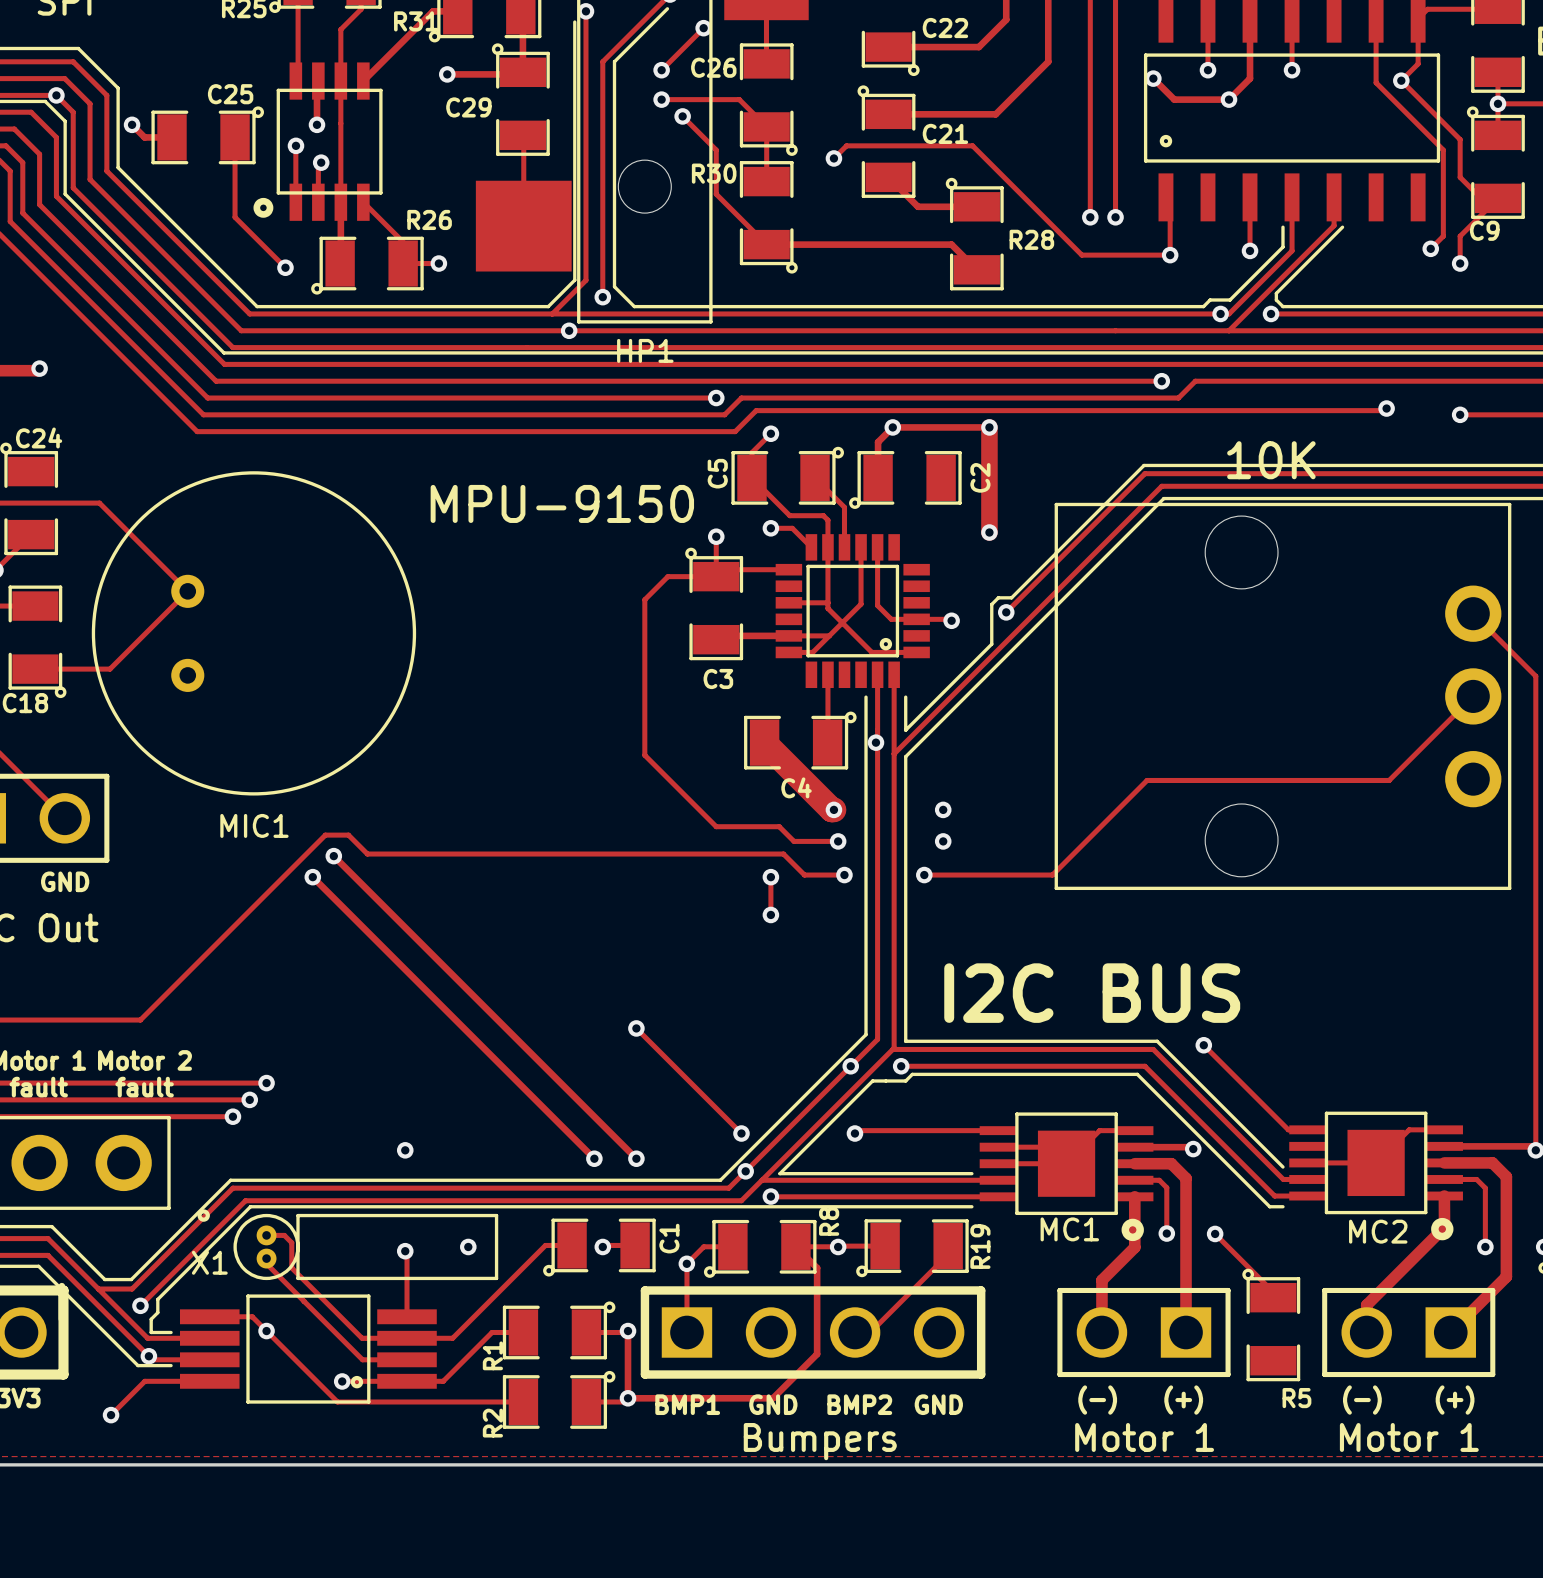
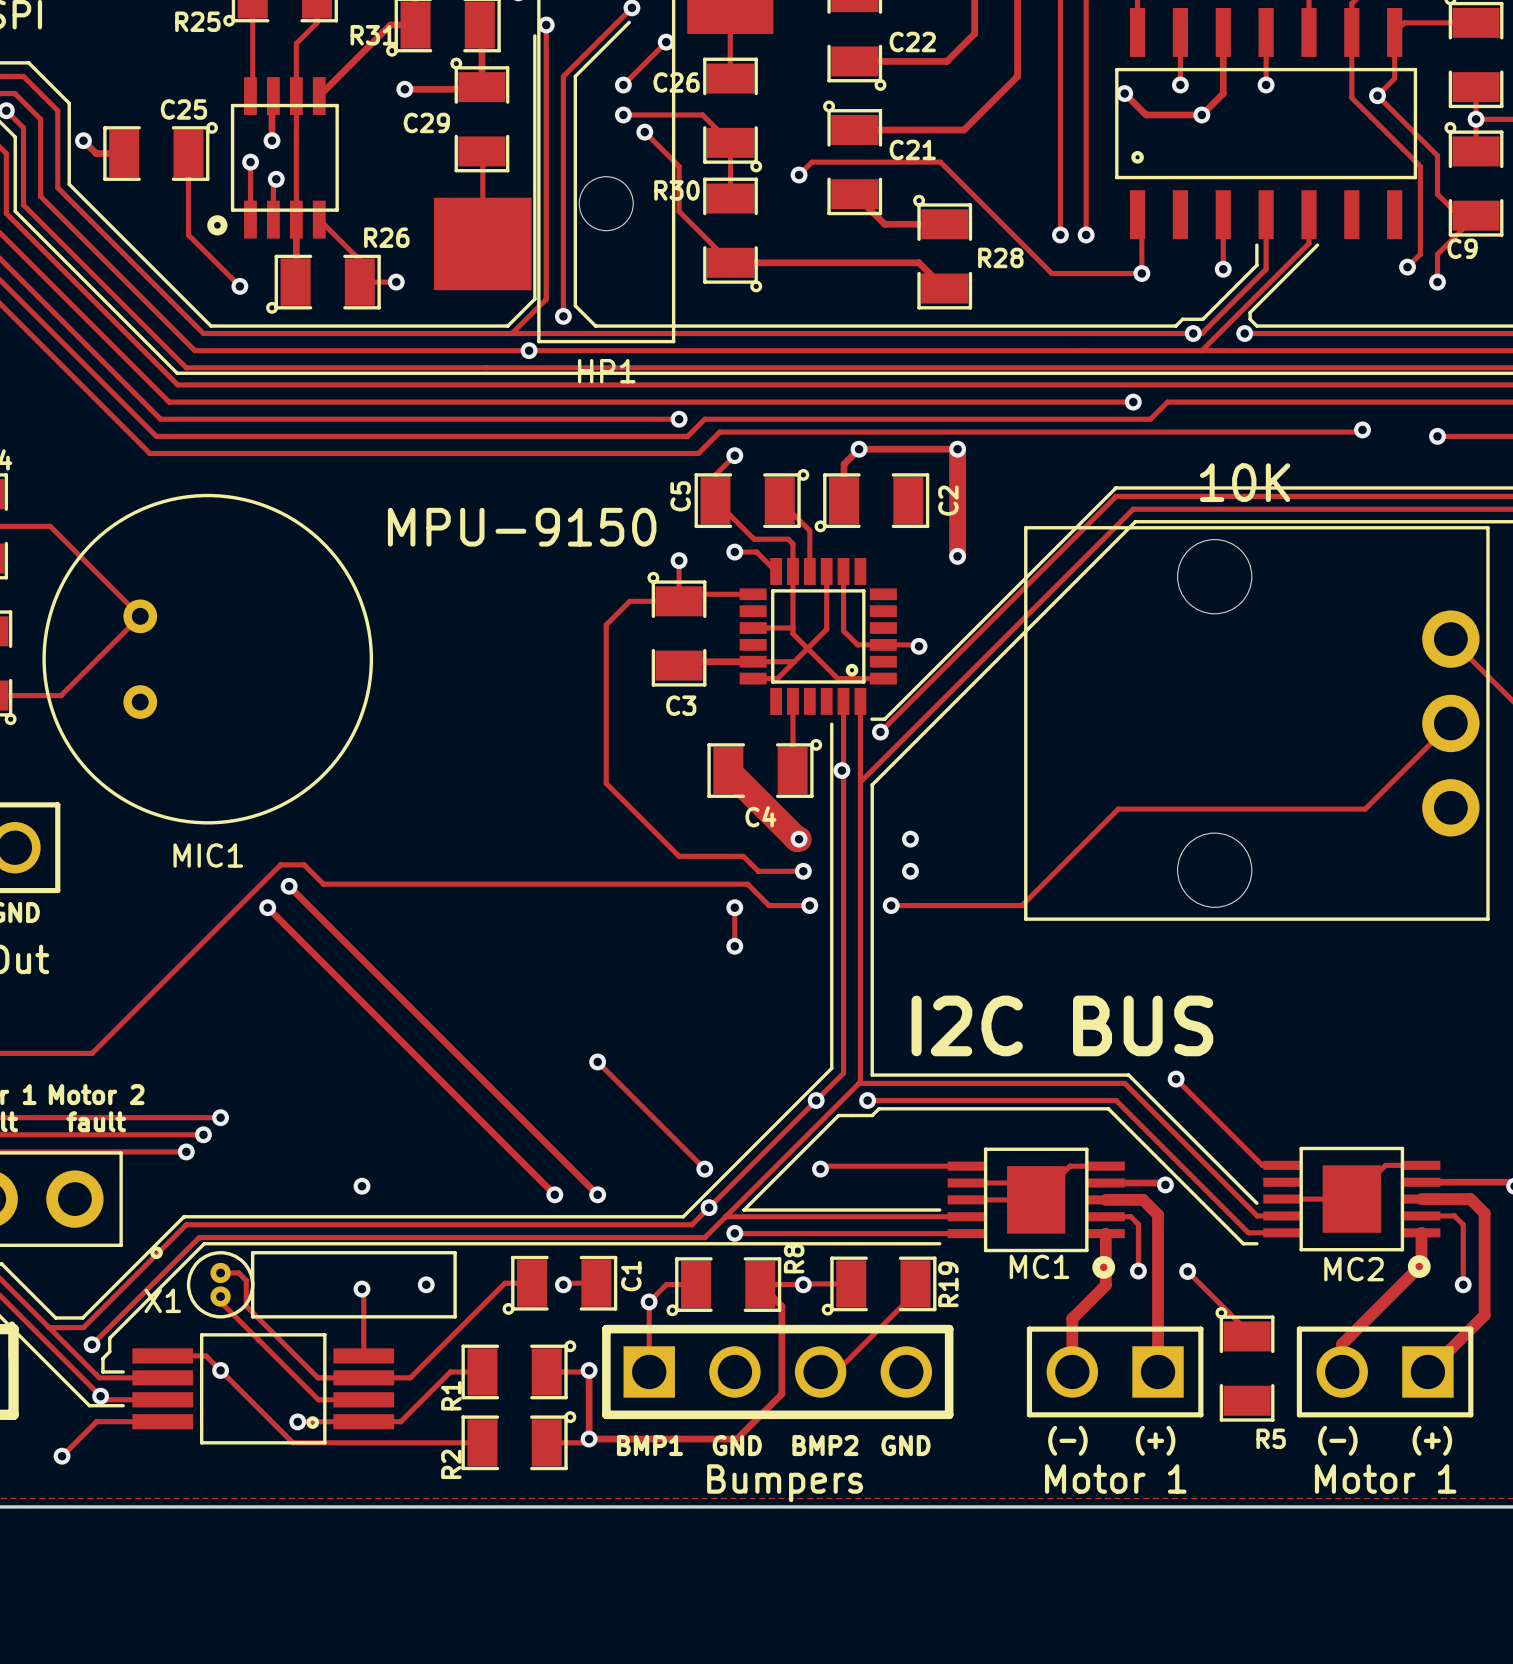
line: (1143, 465) (1011, 597) (998, 597) (991, 604) (991, 644) (905, 730) (905, 697) -> (1116, 487) (884, 719) (871, 719)
track: none -> (974, 637) (880, 732)
via position: (1006, 612) -> (880, 732)

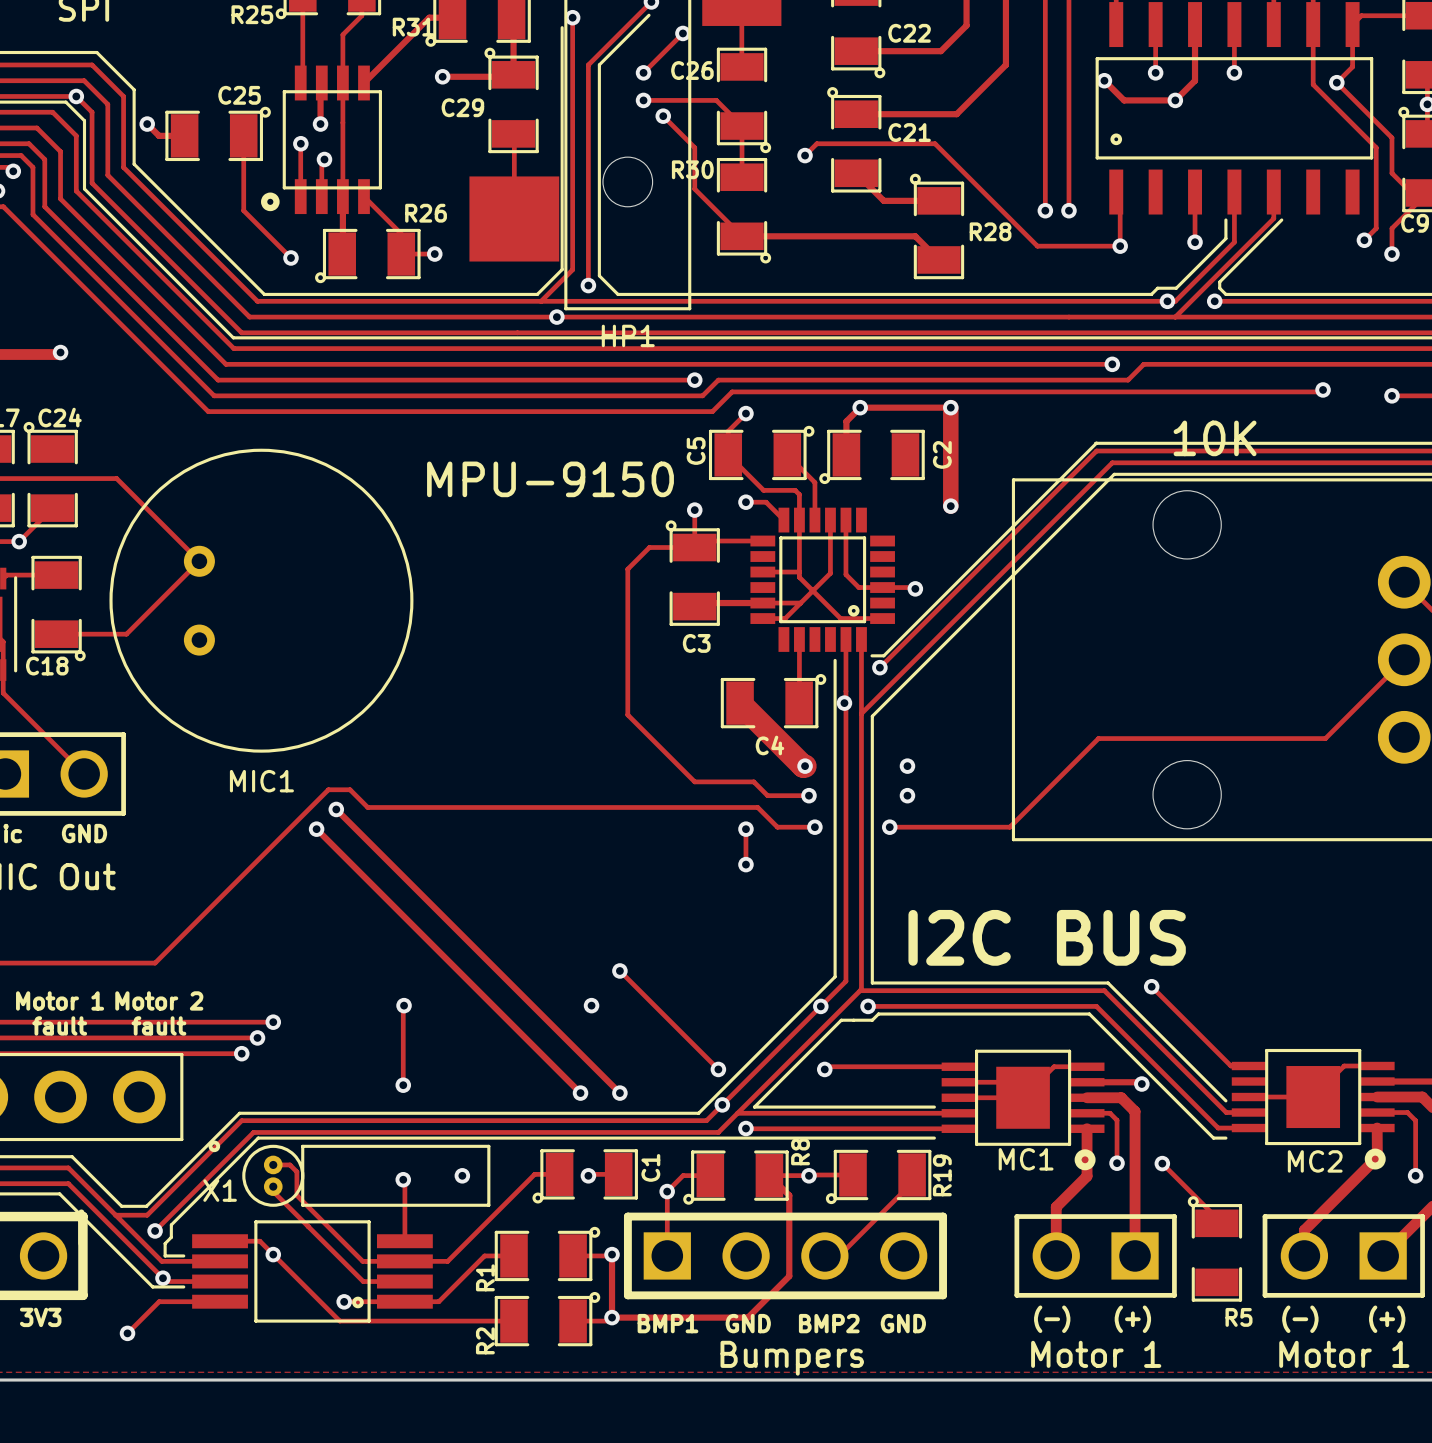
track: none -> (404, 1005) (403, 1085)
via: none -> (404, 1005)
via: none -> (591, 1005)

